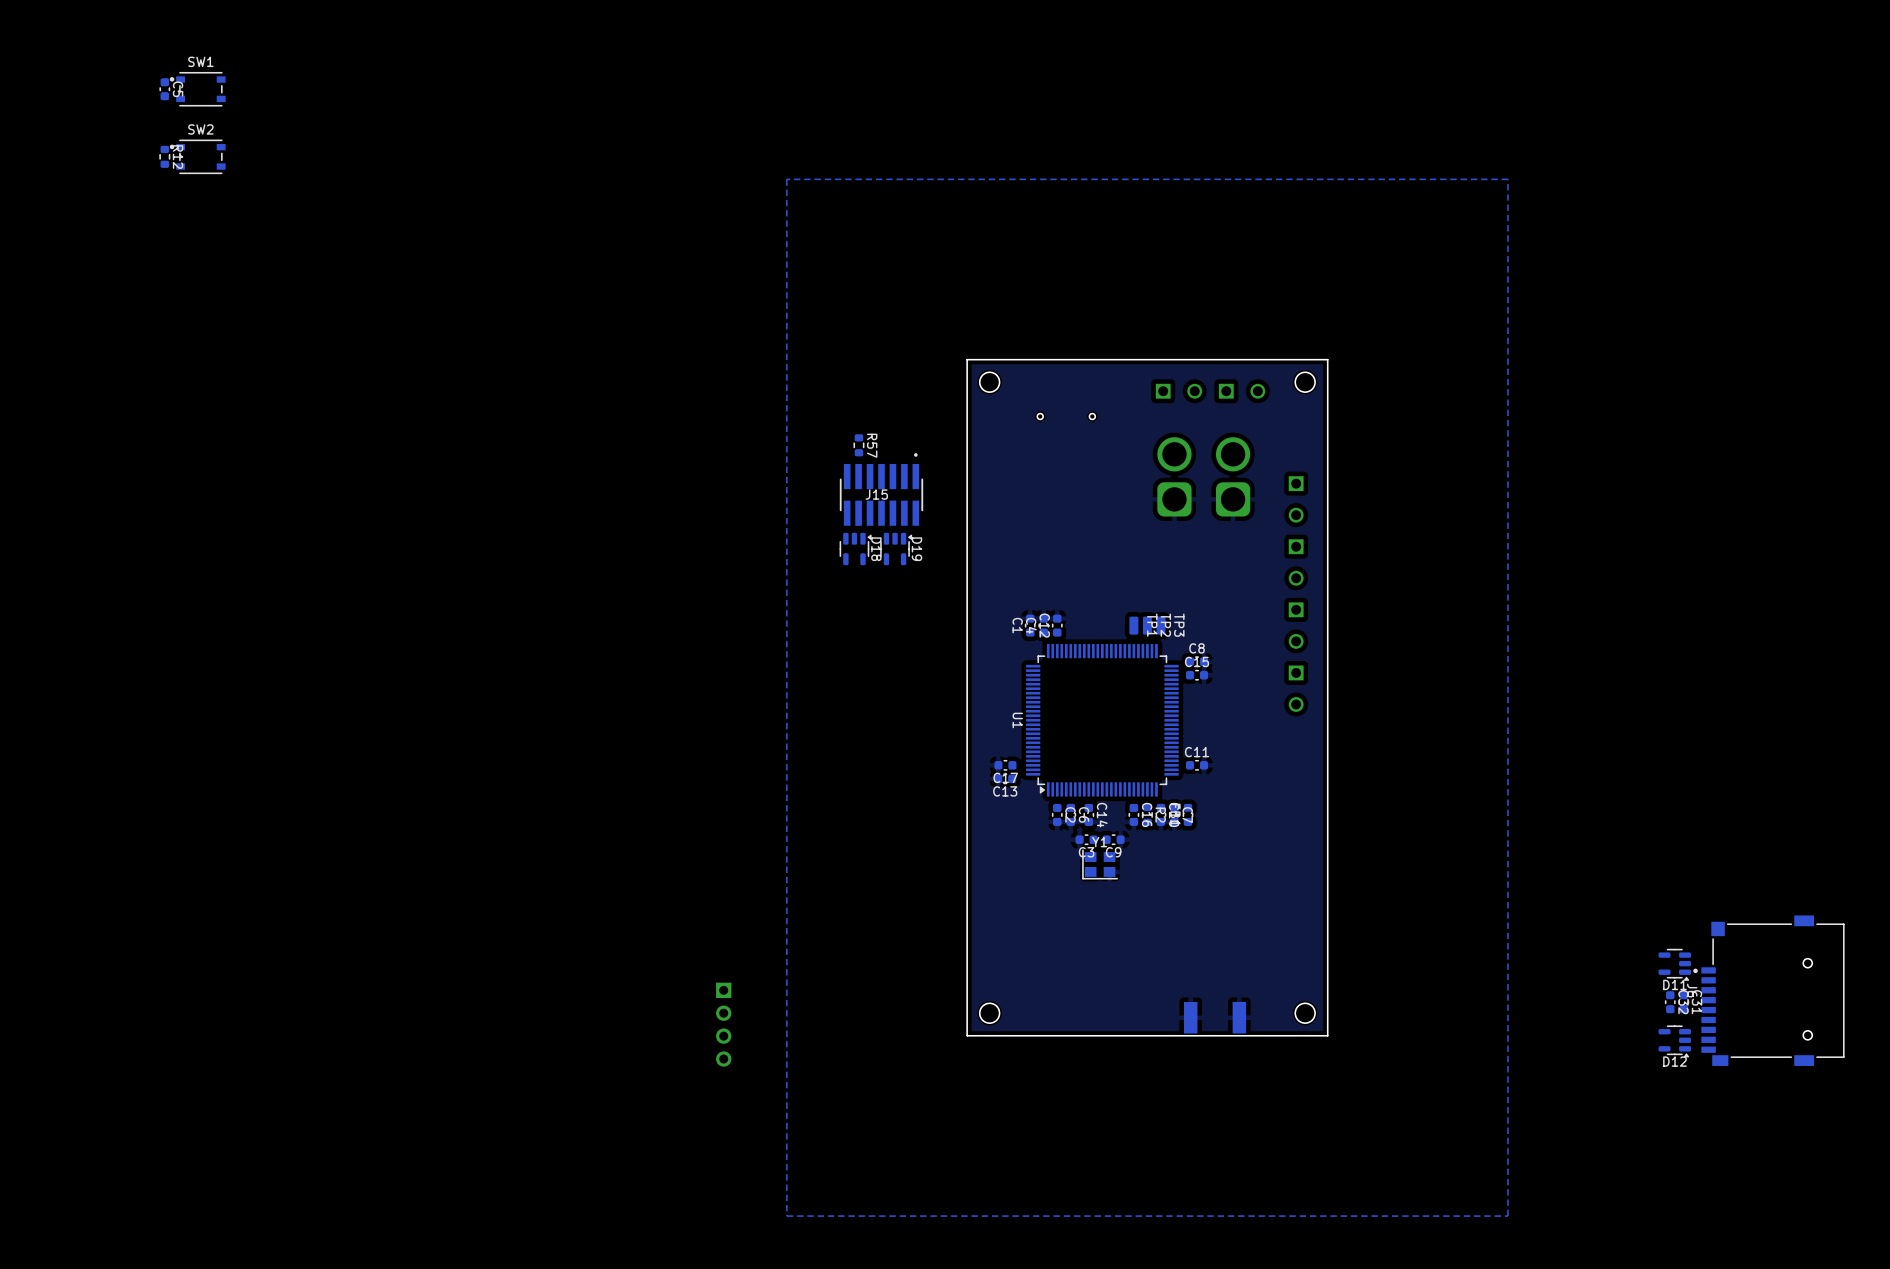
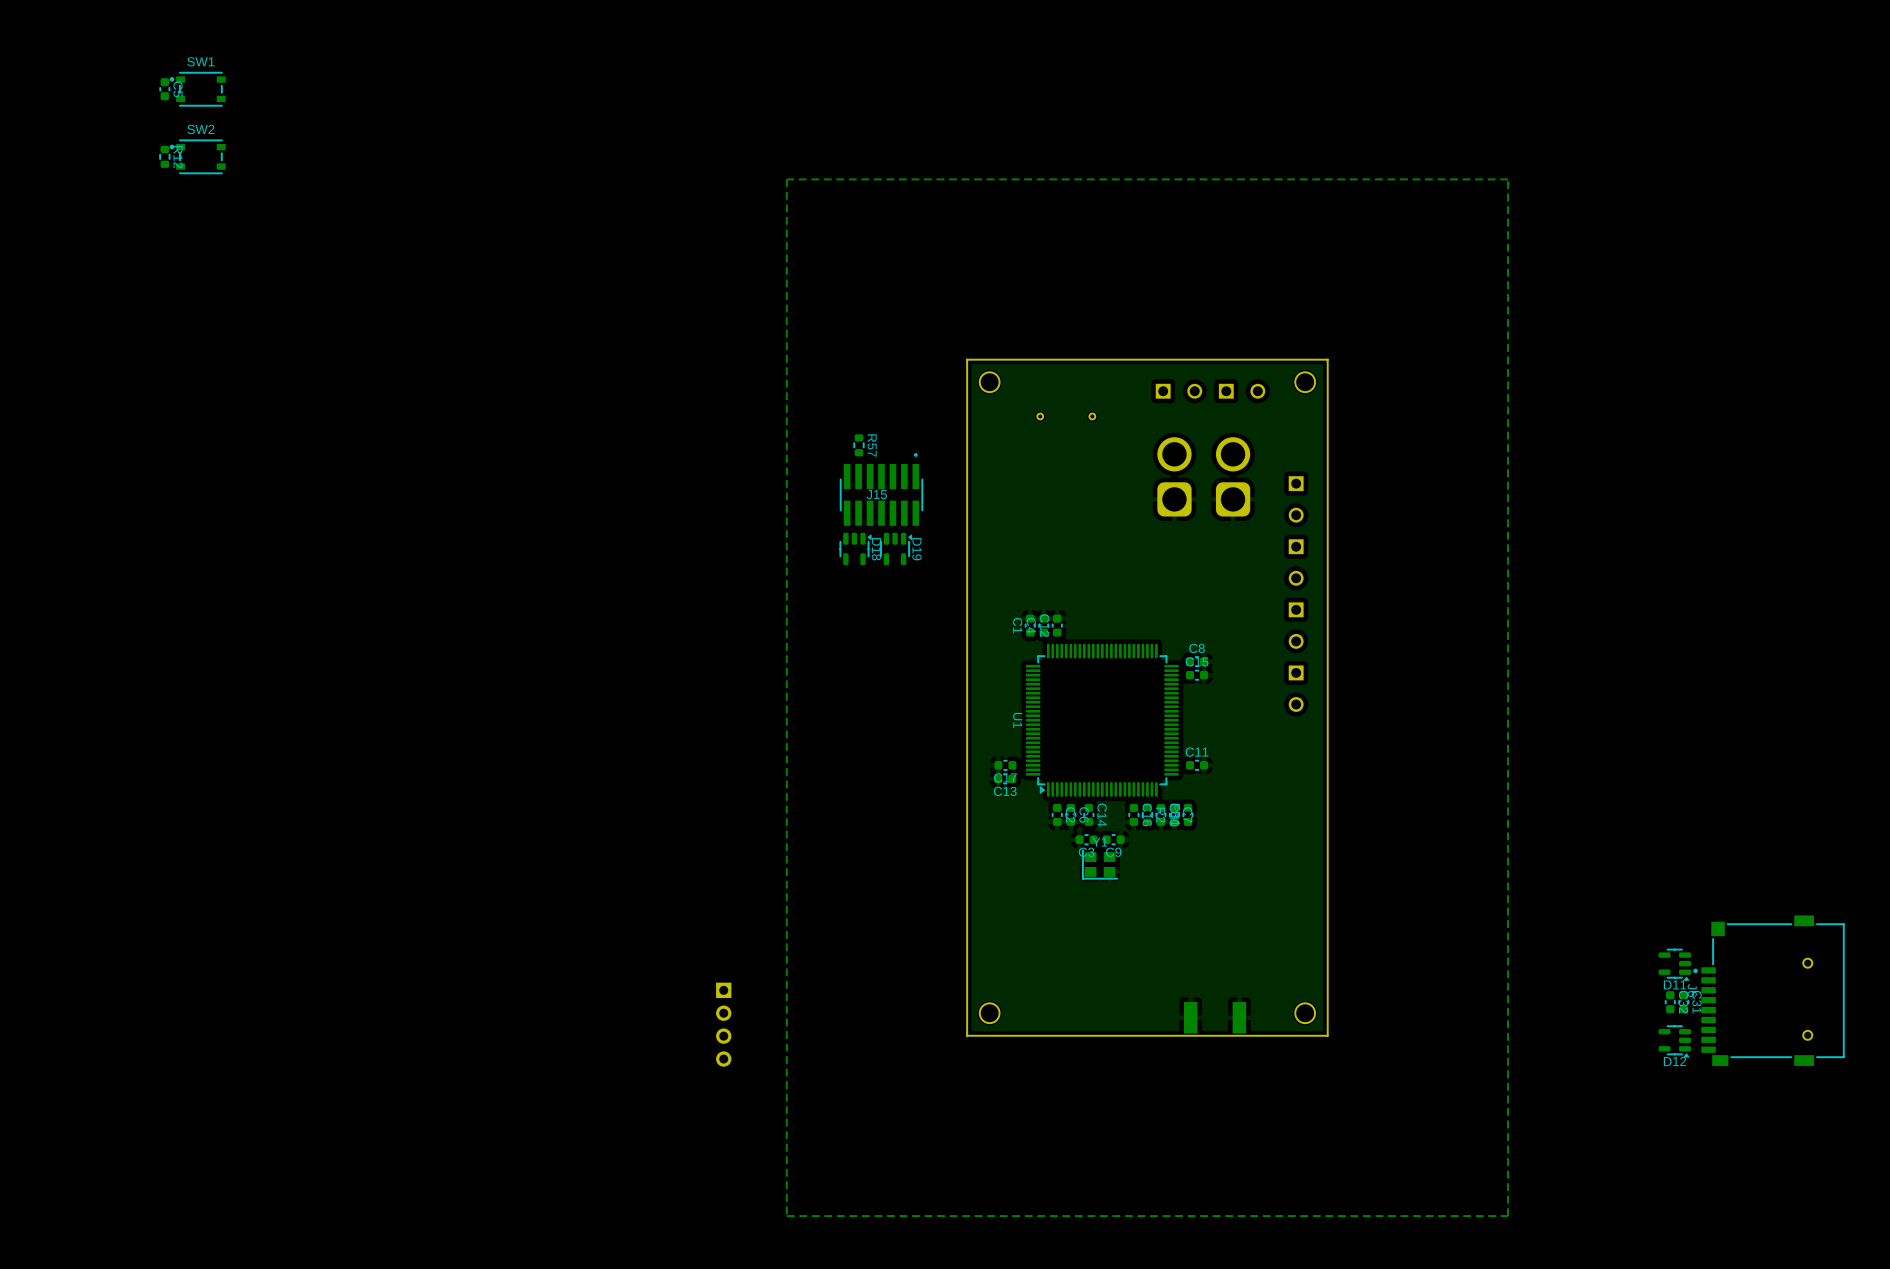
TP1: (1133, 625) -> none
TP2: (1147, 625) -> none
TP3: (1160, 625) -> none

